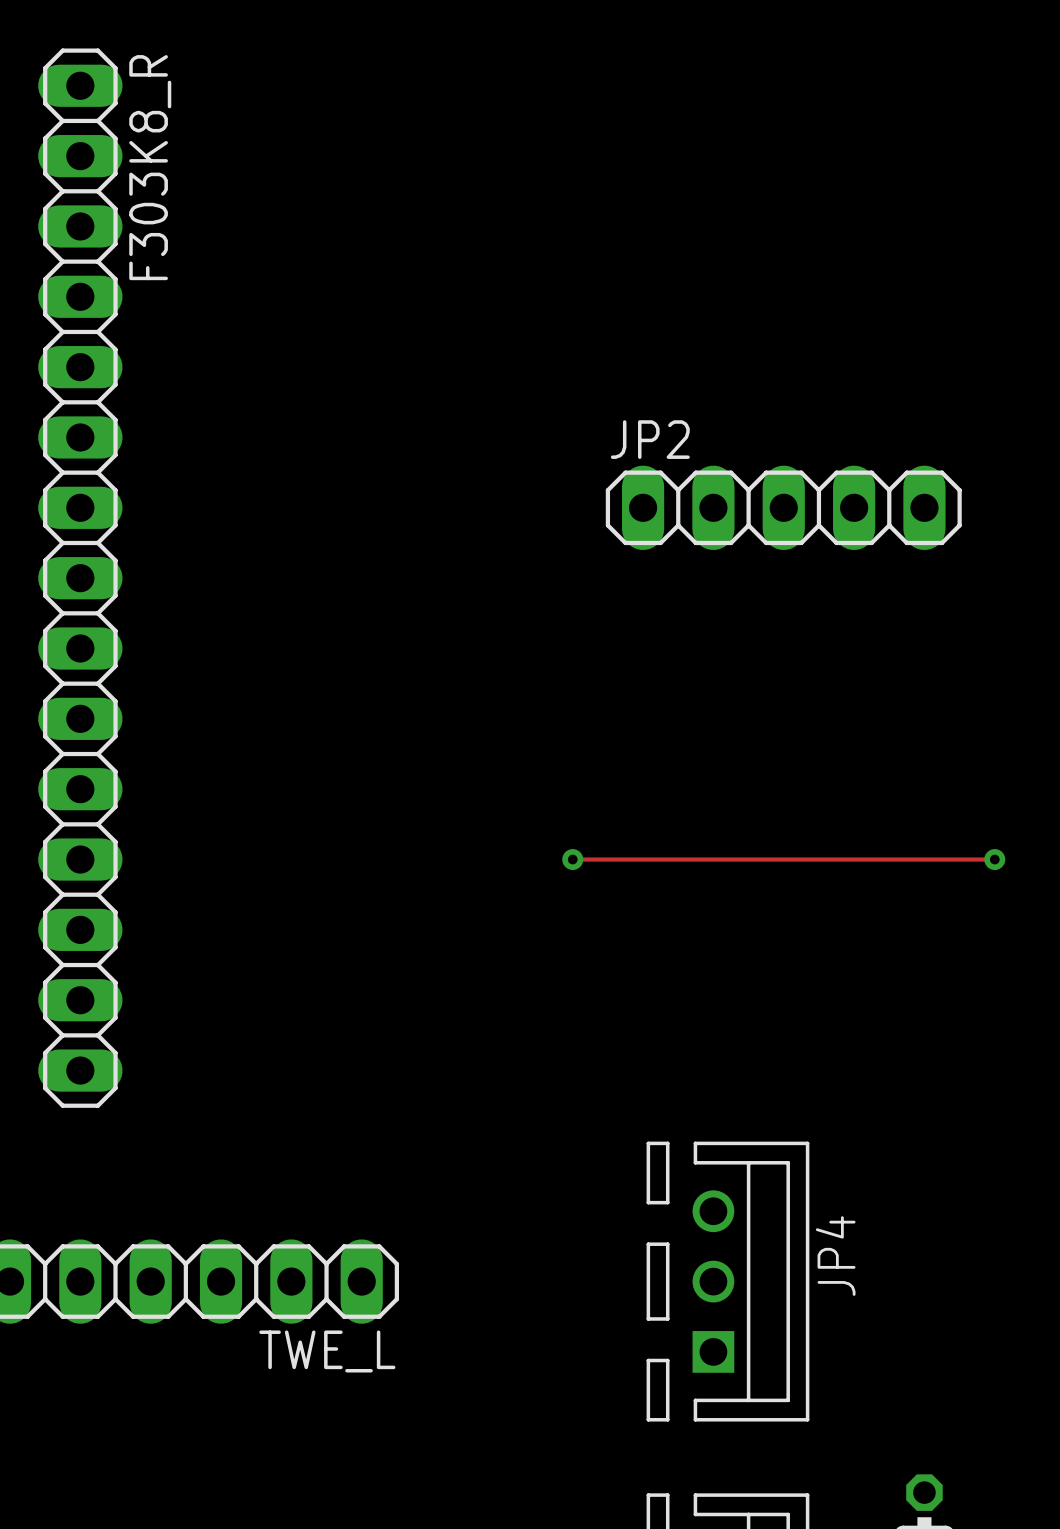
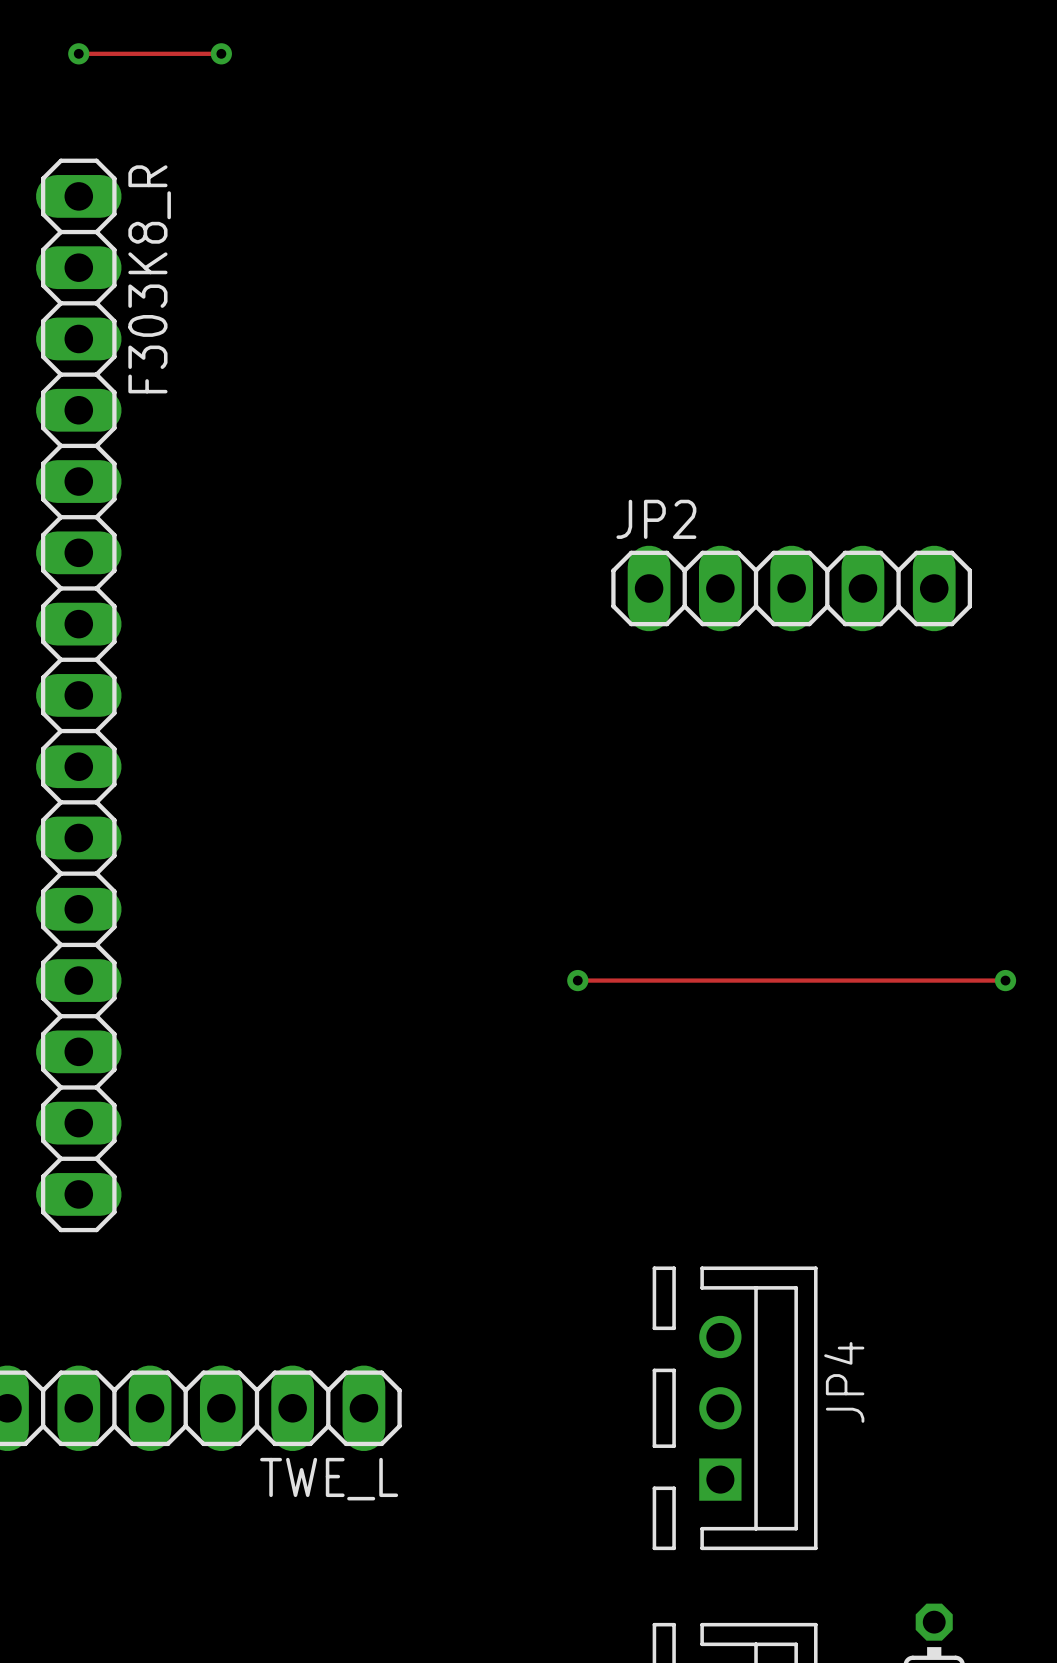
JP2 position: (783, 507) -> (791, 588)

